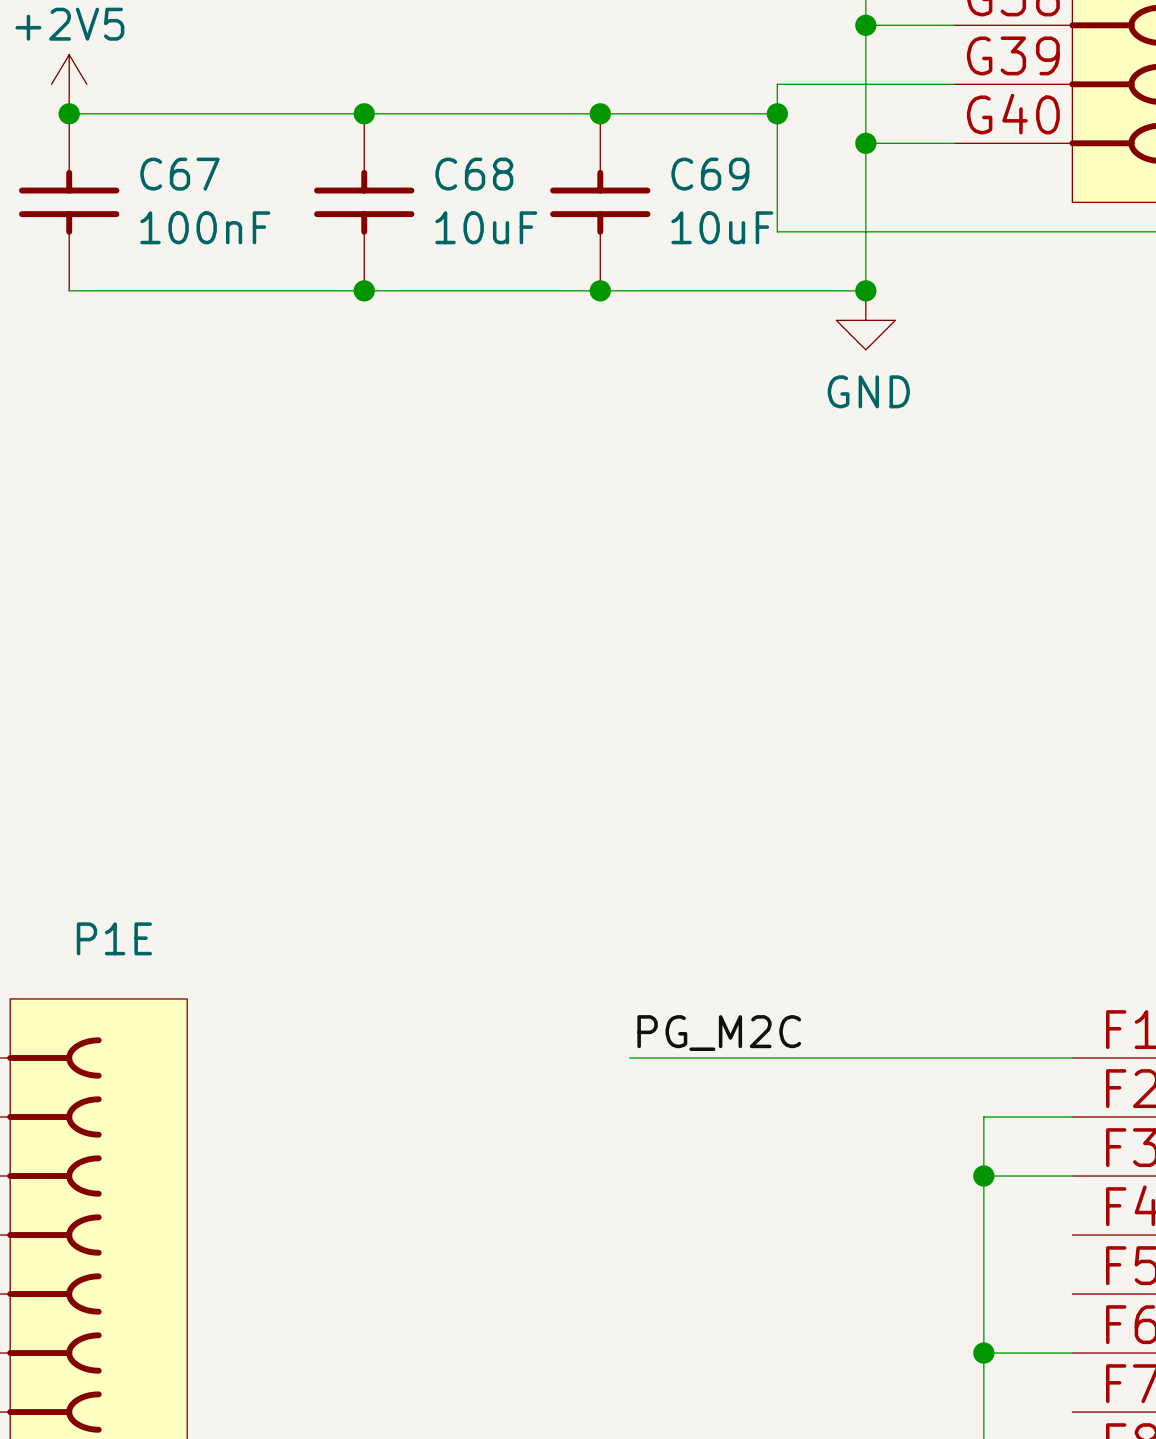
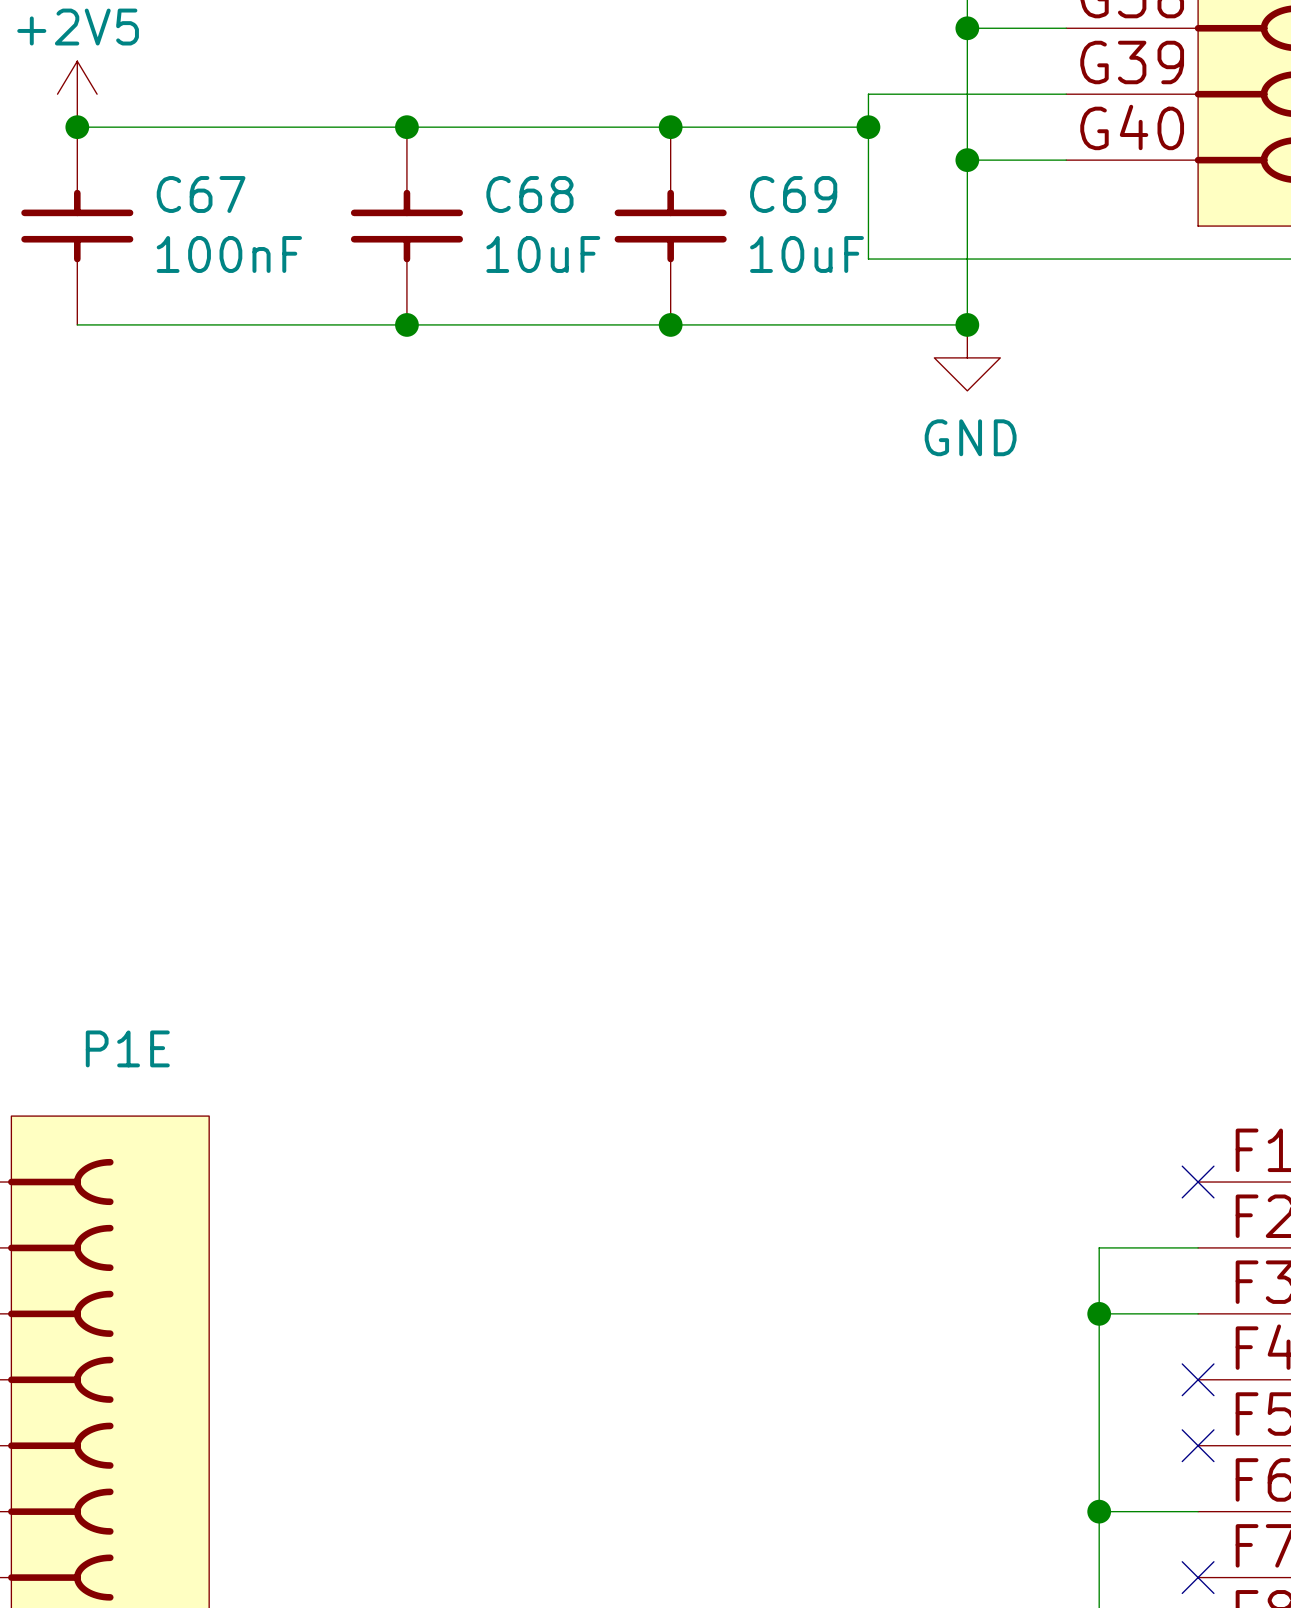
label: PG_M2C (719, 1033) -> none
wire: (629, 1057) (1072, 1057) -> none
no-connect mark: none -> (1198, 1182)
no-connect mark: none -> (1198, 1379)
no-connect mark: none -> (1198, 1445)
no-connect mark: none -> (1198, 1577)

